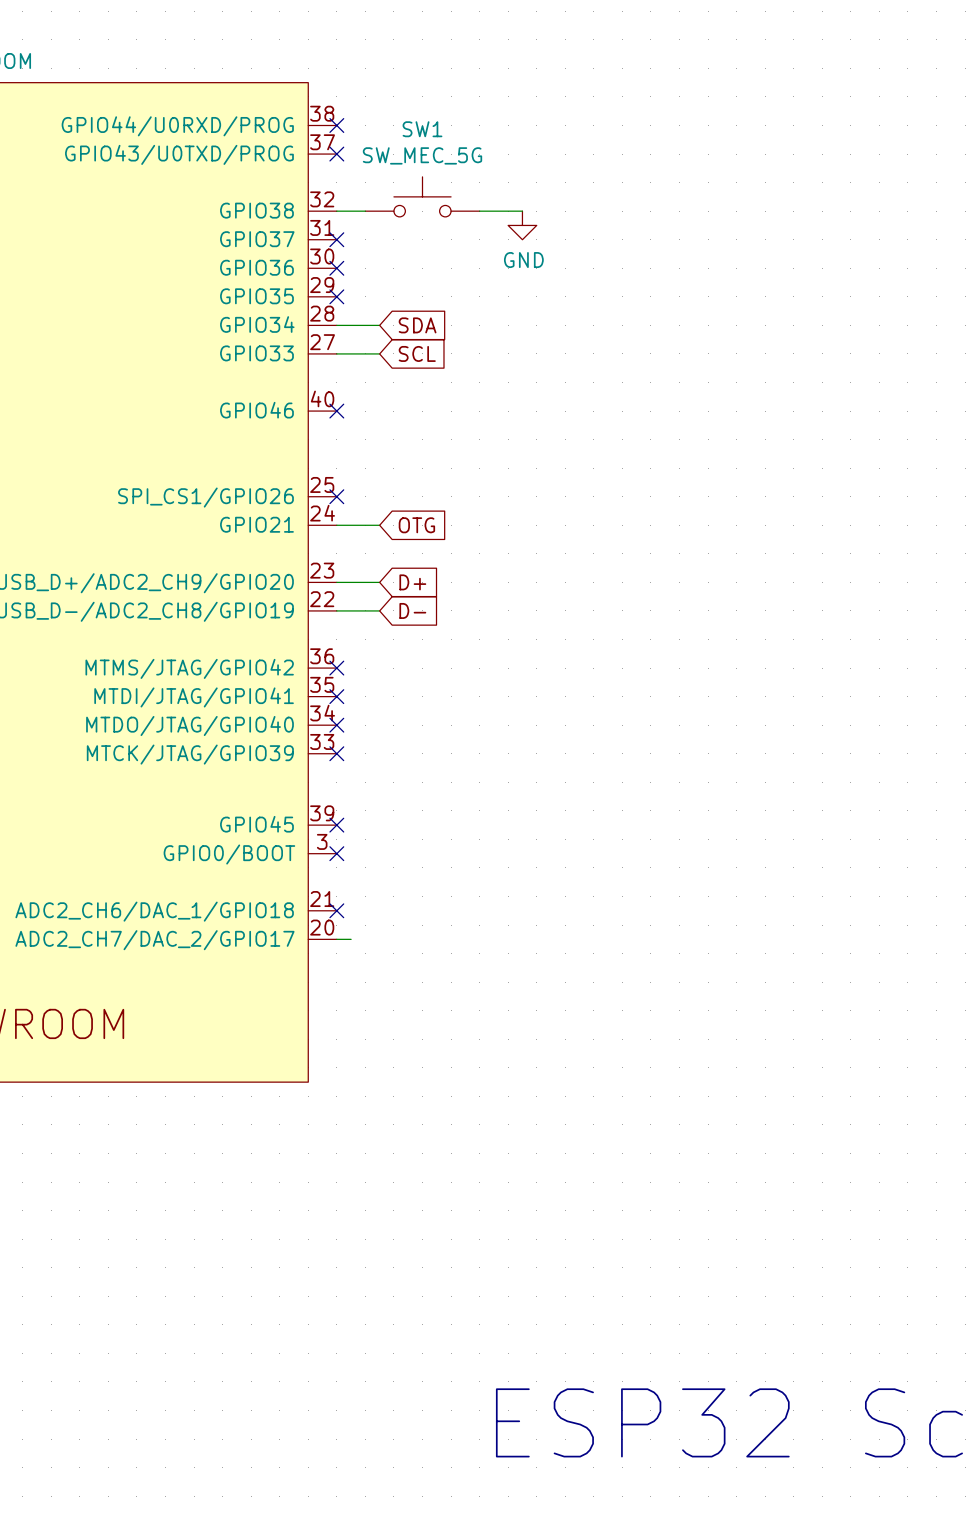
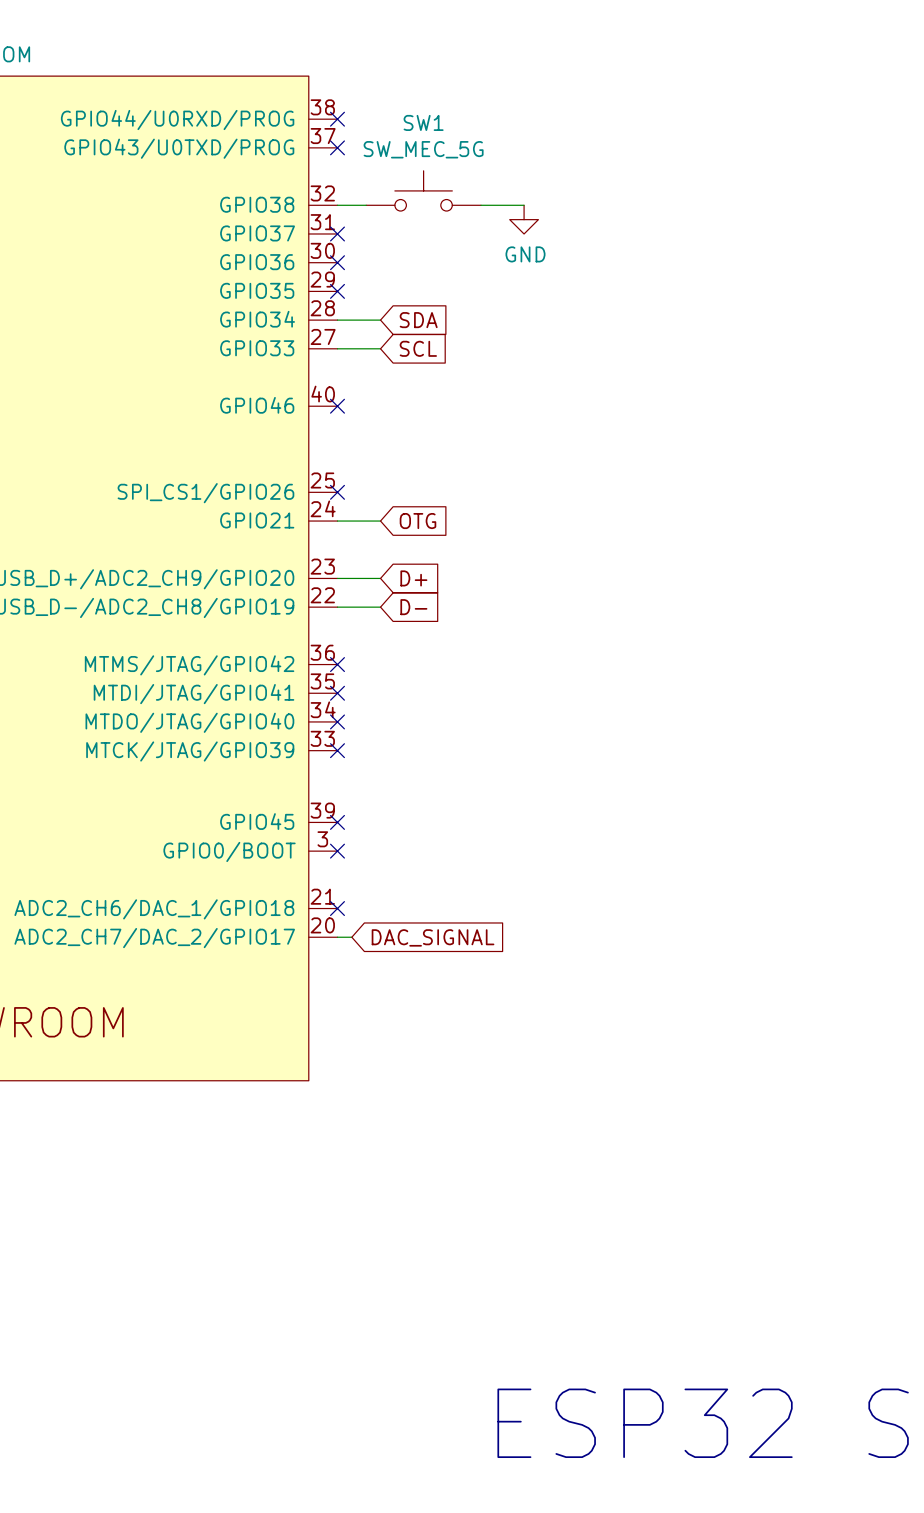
global label: none -> DAC_SIGNAL (433, 937)

